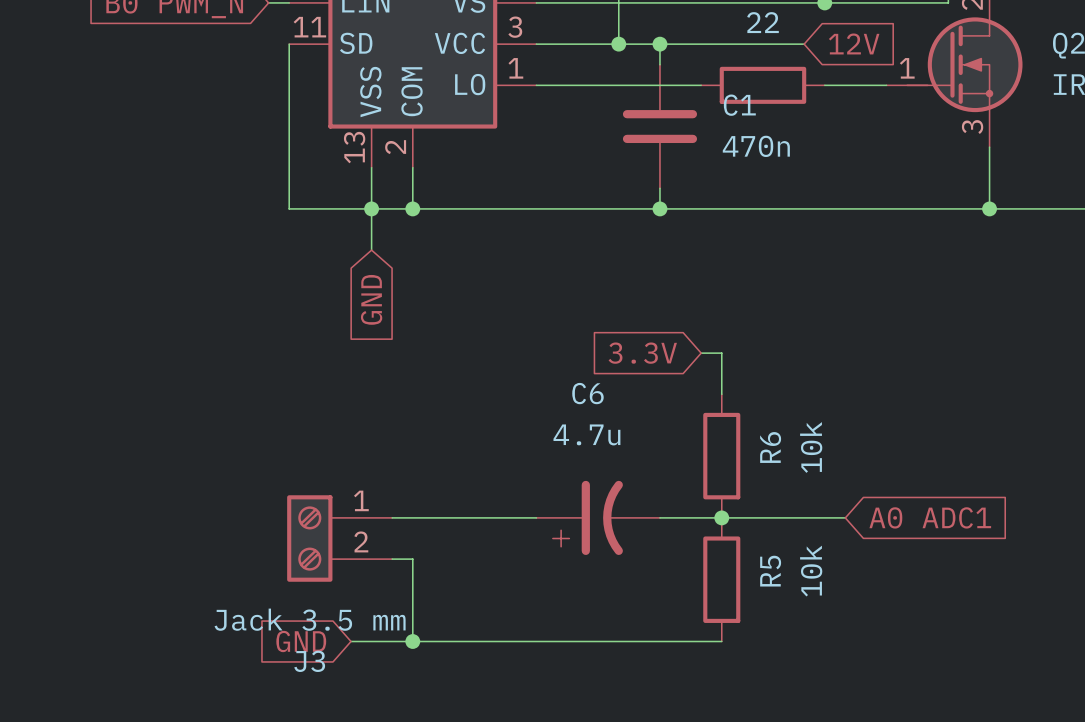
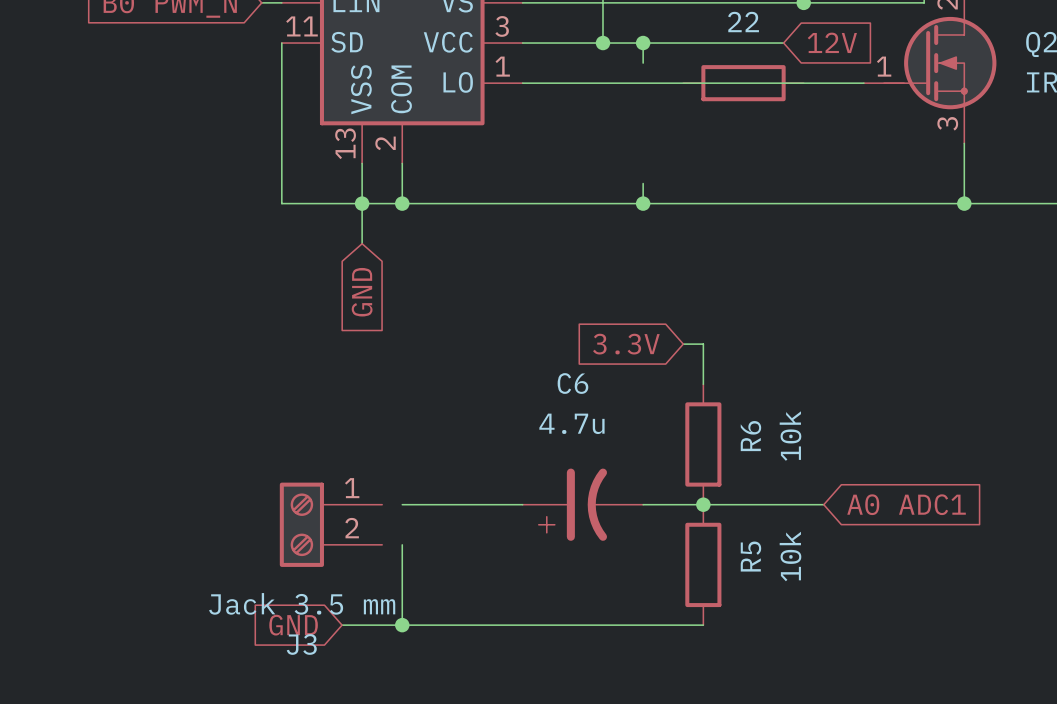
wire: none -> (683, 83) (803, 83)
C1: 470n (659, 126) -> none
wire: (392, 517) (412, 517) -> none
wire: (392, 559) (412, 559) -> none

